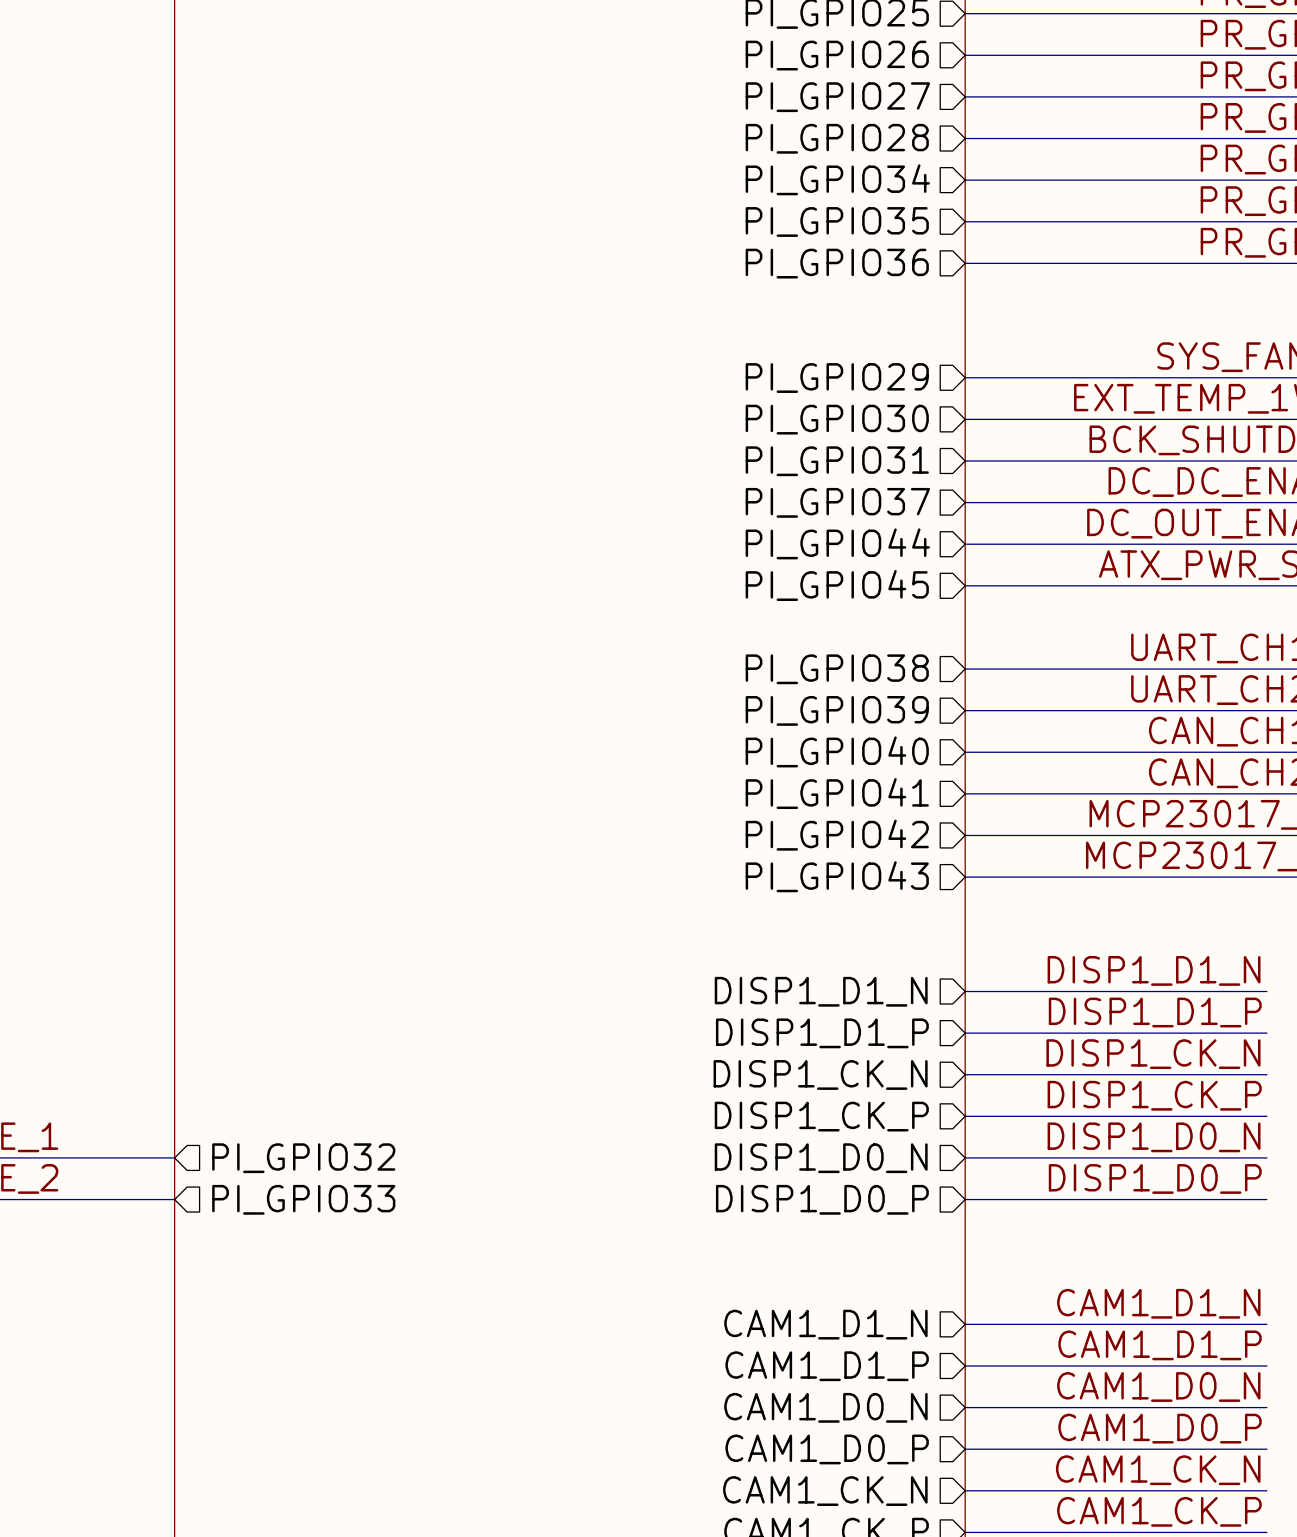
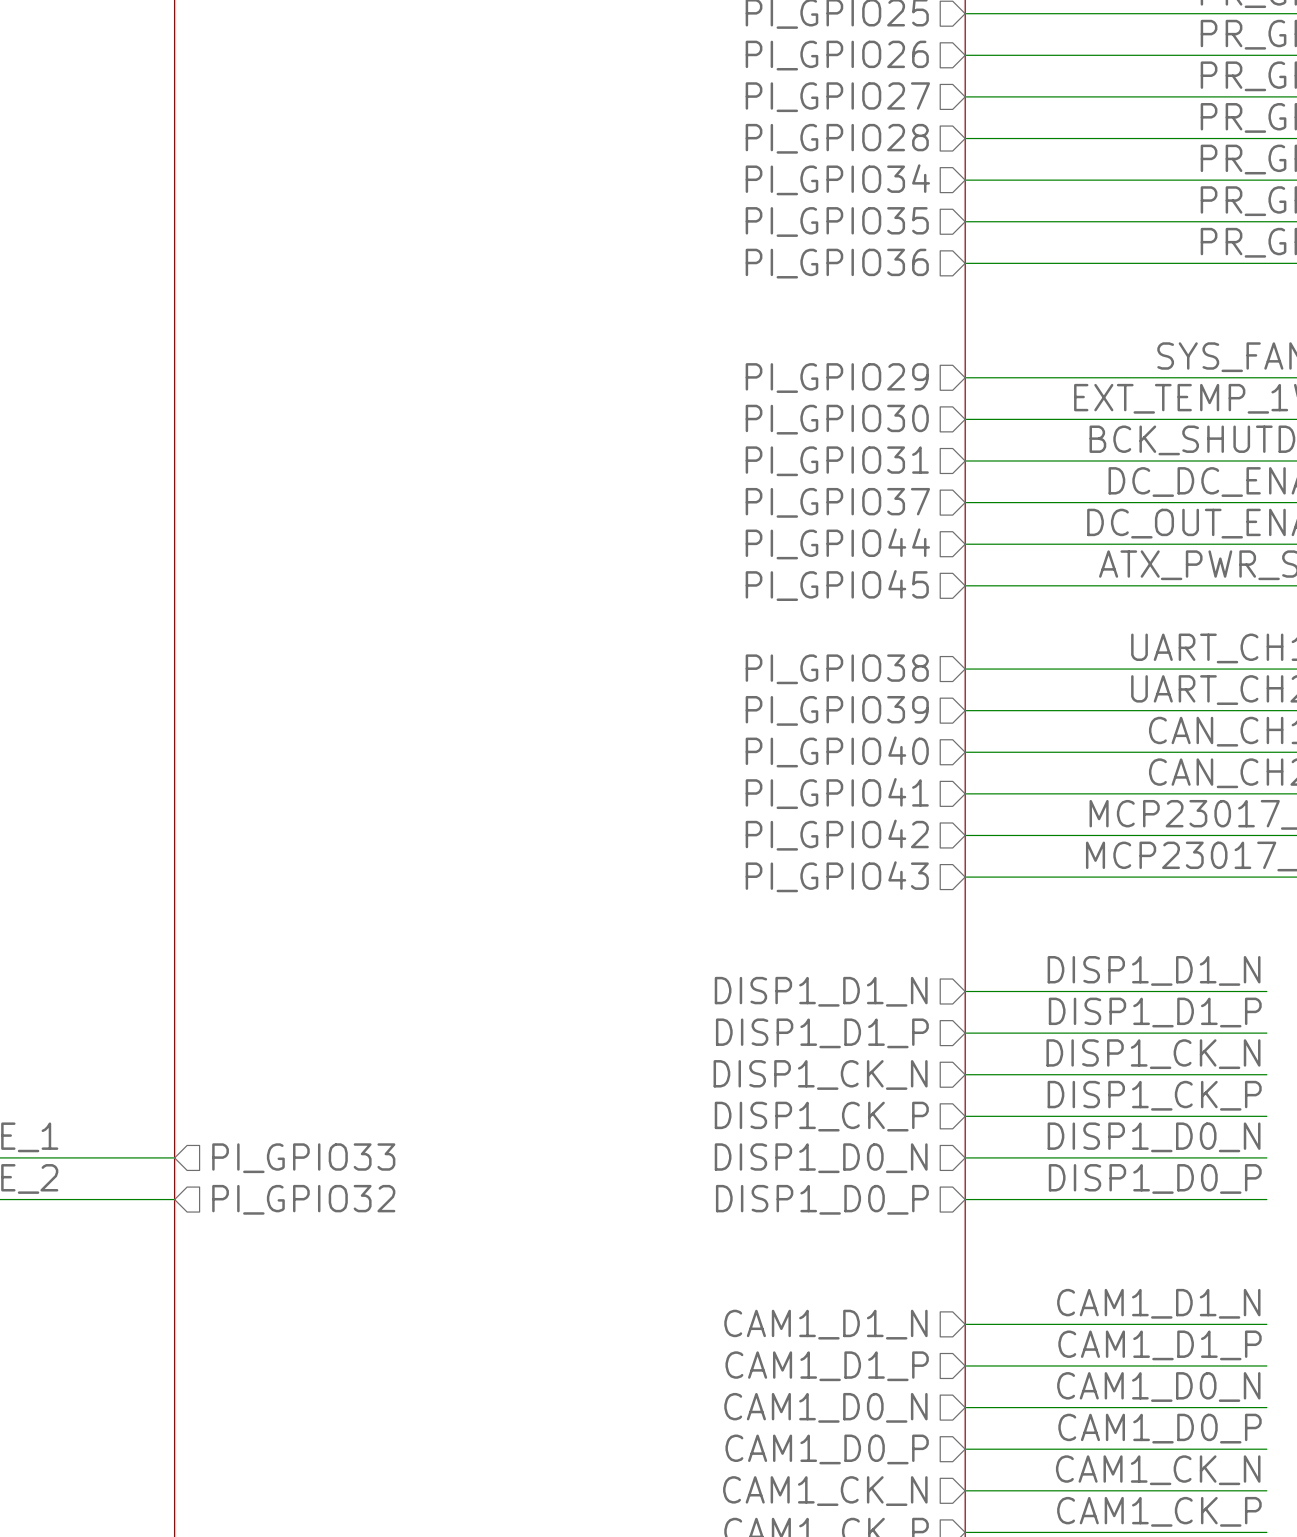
sheet pin: PI_GPIO32 (303, 1158) -> PI_GPIO33 (303, 1158)
sheet pin: PI_GPIO33 (303, 1199) -> PI_GPIO32 (303, 1199)

